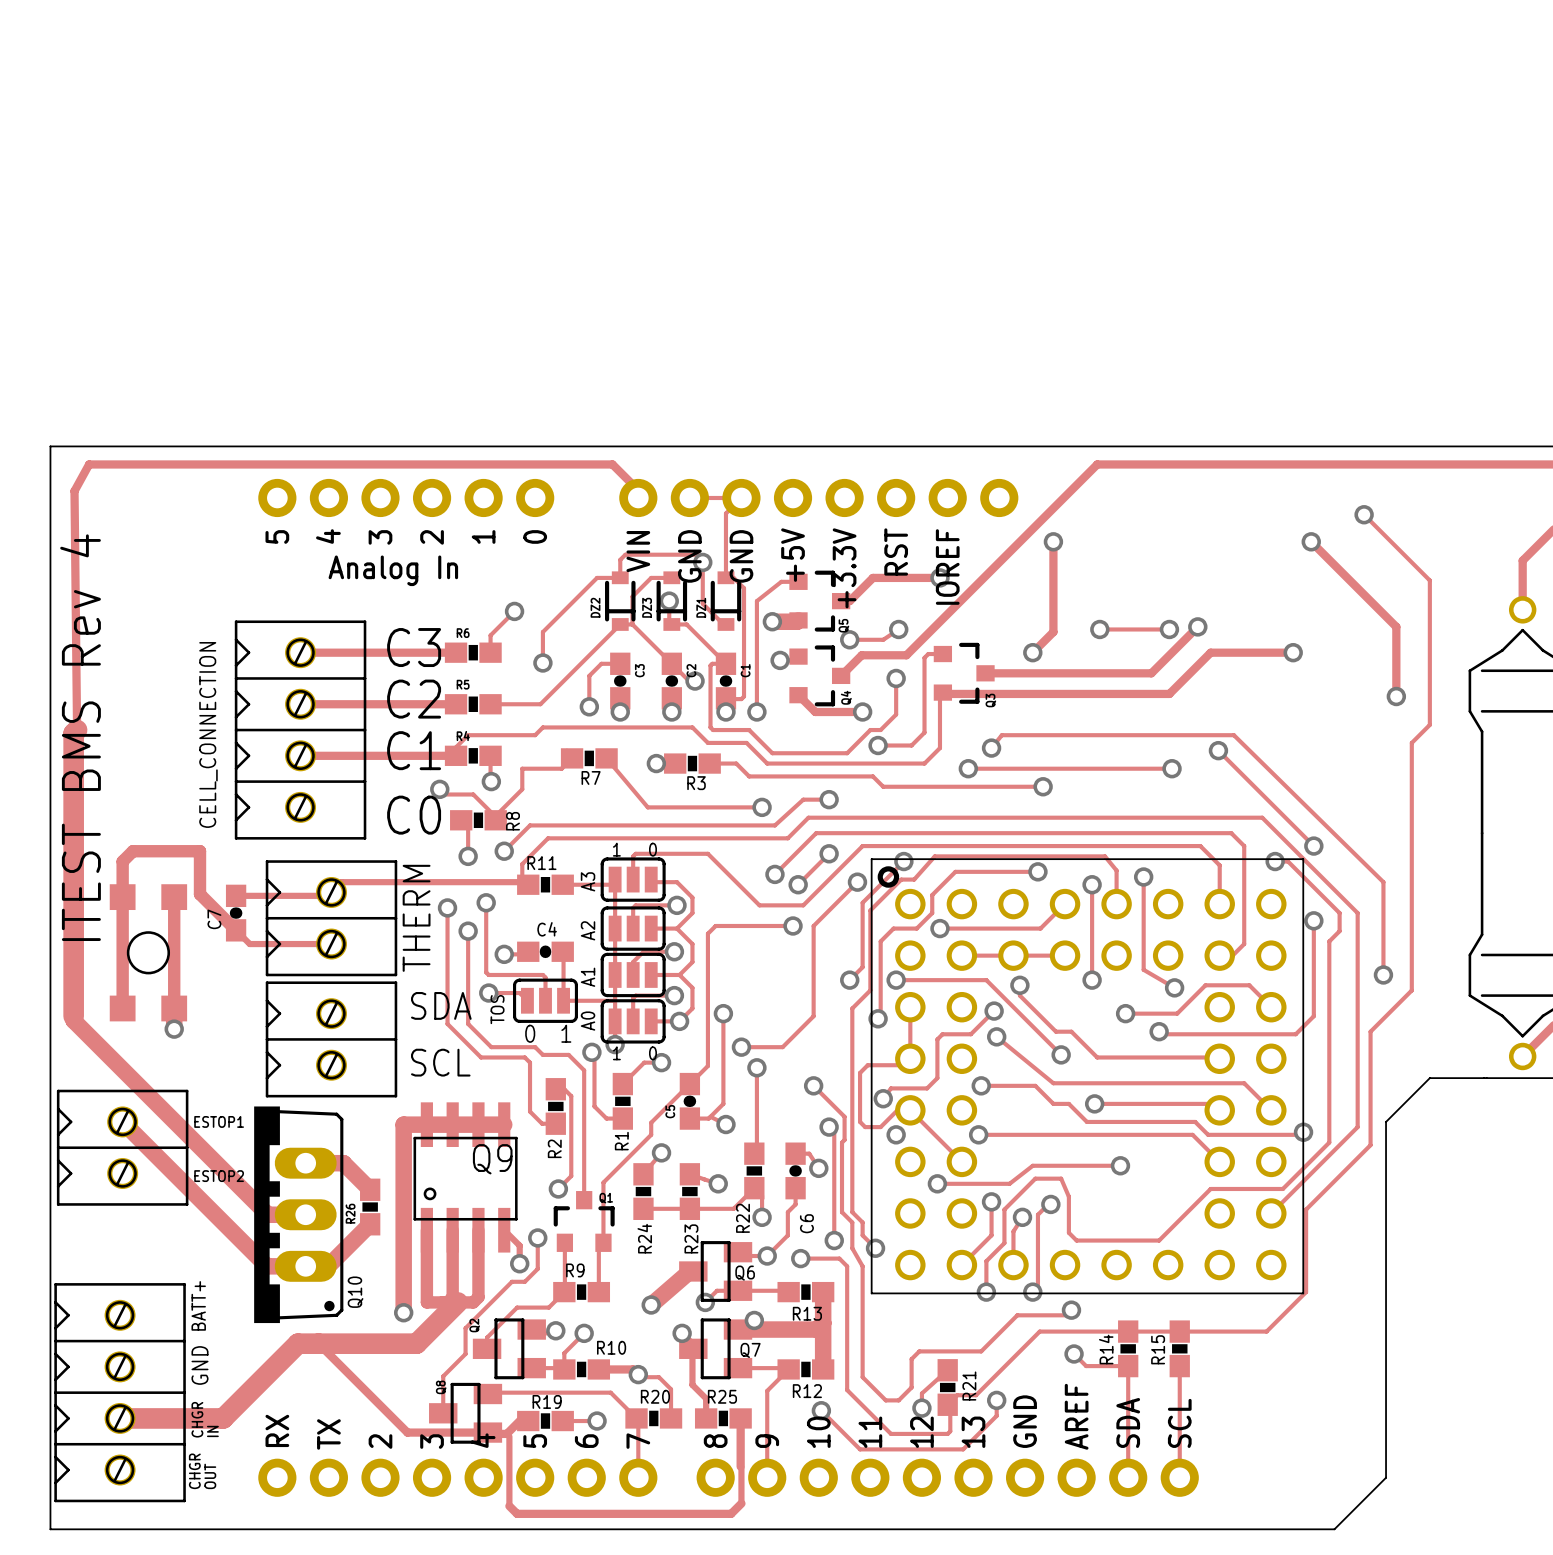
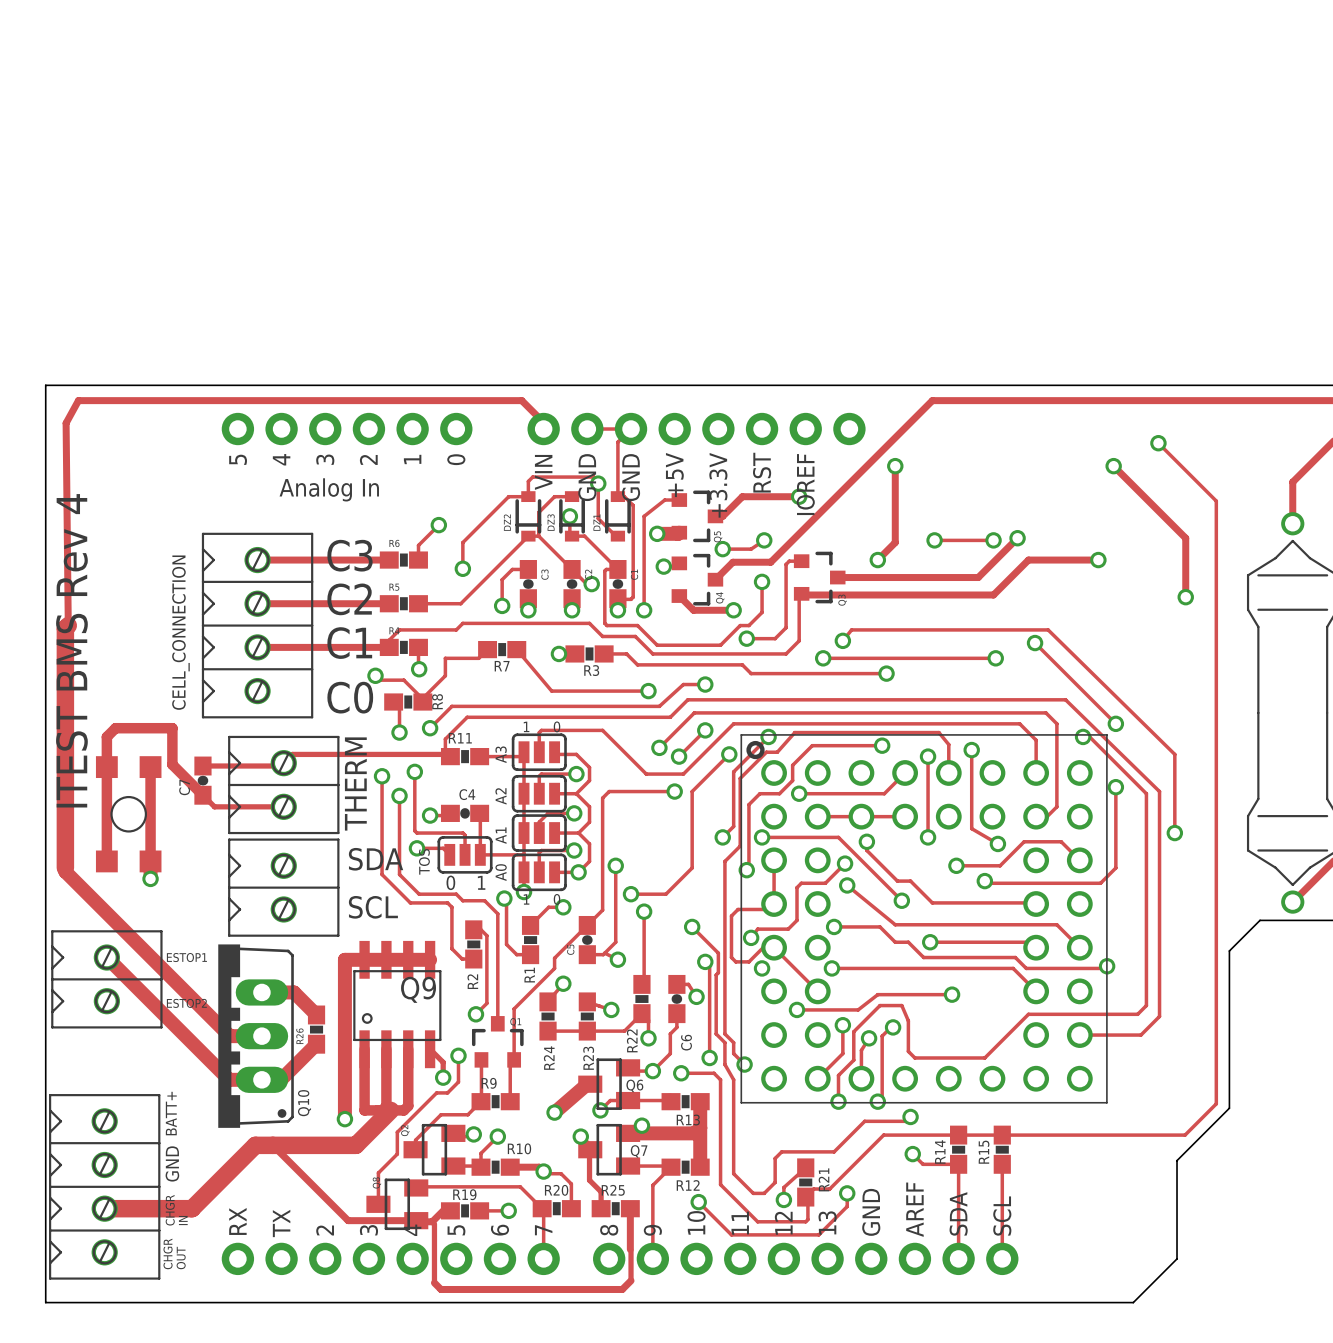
track: (1429, 580) (1429, 724) (1411, 742) (1411, 990) (1370, 1031) (1370, 1145) (1306, 1209) (1306, 1292) (1266, 1331) -> (1214, 498) (1216, 501) (1216, 1103) (1185, 1135) (1075, 1135)
track: (1254, 817) (1262, 817) (1357, 913) (1357, 1127) (1271, 1213) -> (1065, 699) (1159, 791) (1159, 1016) (1140, 1035) (1079, 1035)
track: (1282, 861) (1288, 861) (1339, 913) (1339, 931) (1329, 941) (1329, 1142) (1282, 1188) -> (1089, 736) (1146, 793) (1146, 1005) (1137, 1014) (1089, 1014)
board edge: (1484, 1078) (1429, 1078) (1386, 1121) (1386, 1361) -> (1259, 920) (1229, 950) (1229, 1108) (1177, 1160)

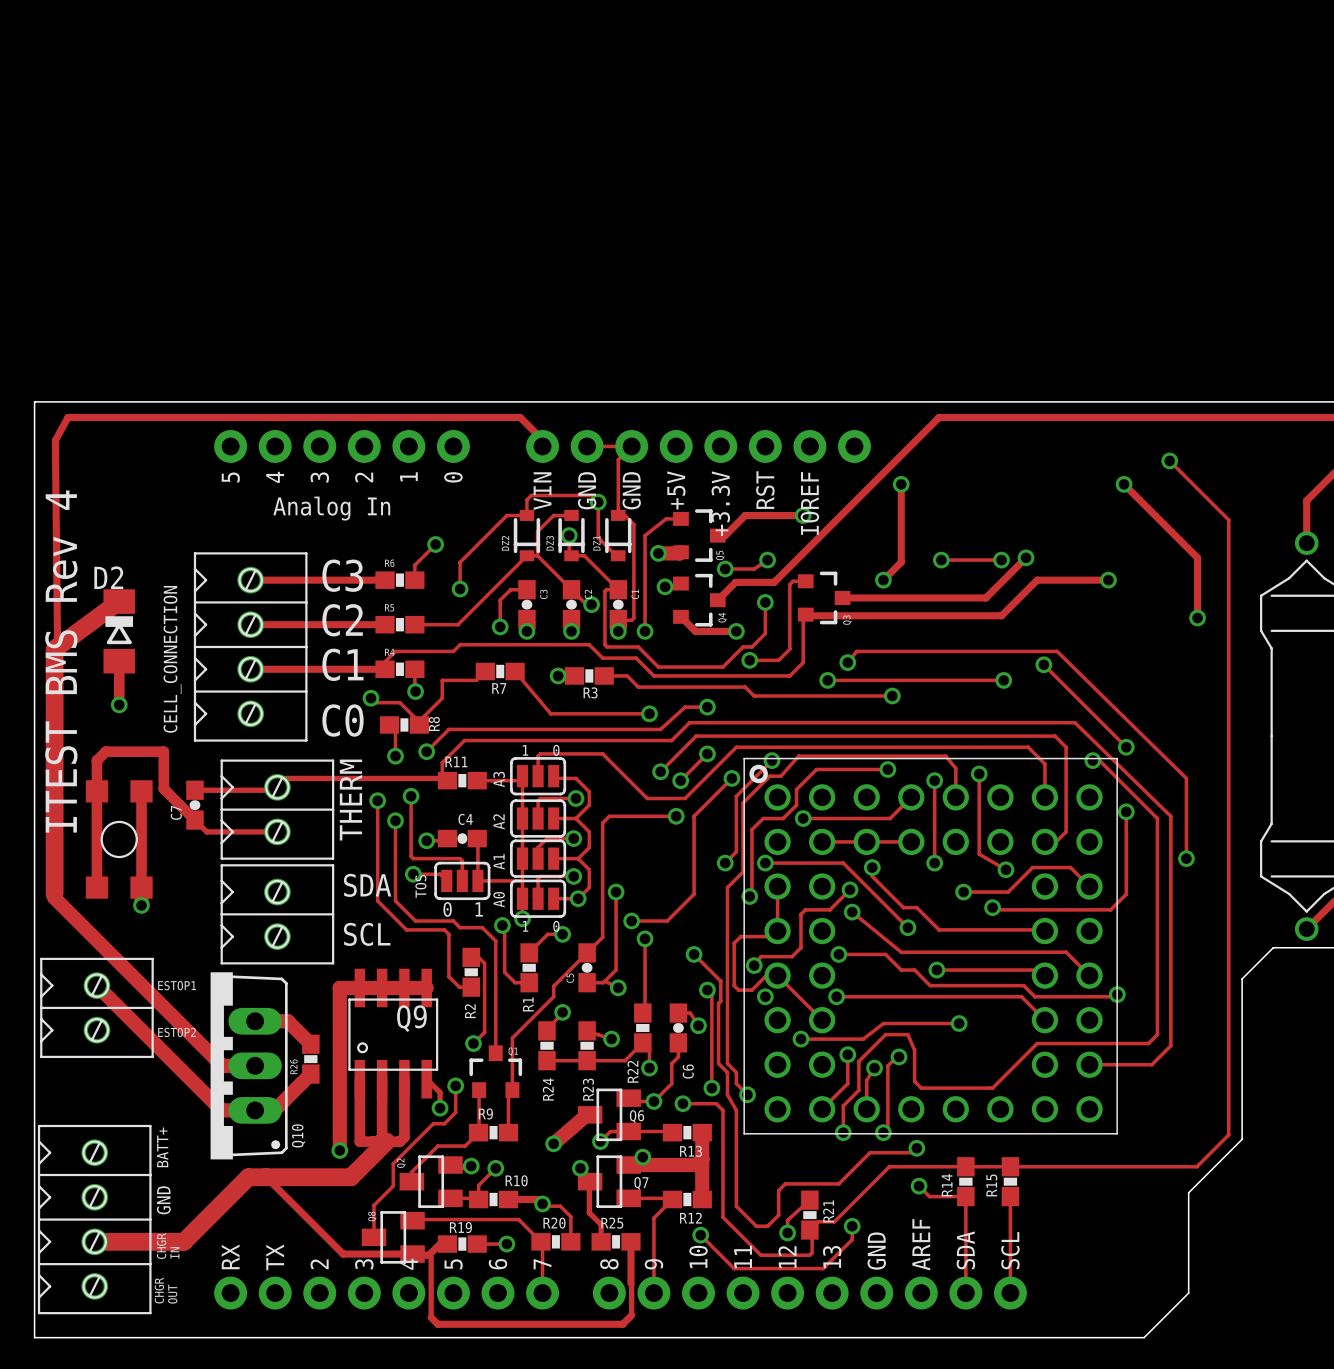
track: none -> (119, 601) (57, 646)
D2: none -> (119, 631)
track: none -> (119, 661) (119, 704)
via: none -> (119, 704)

